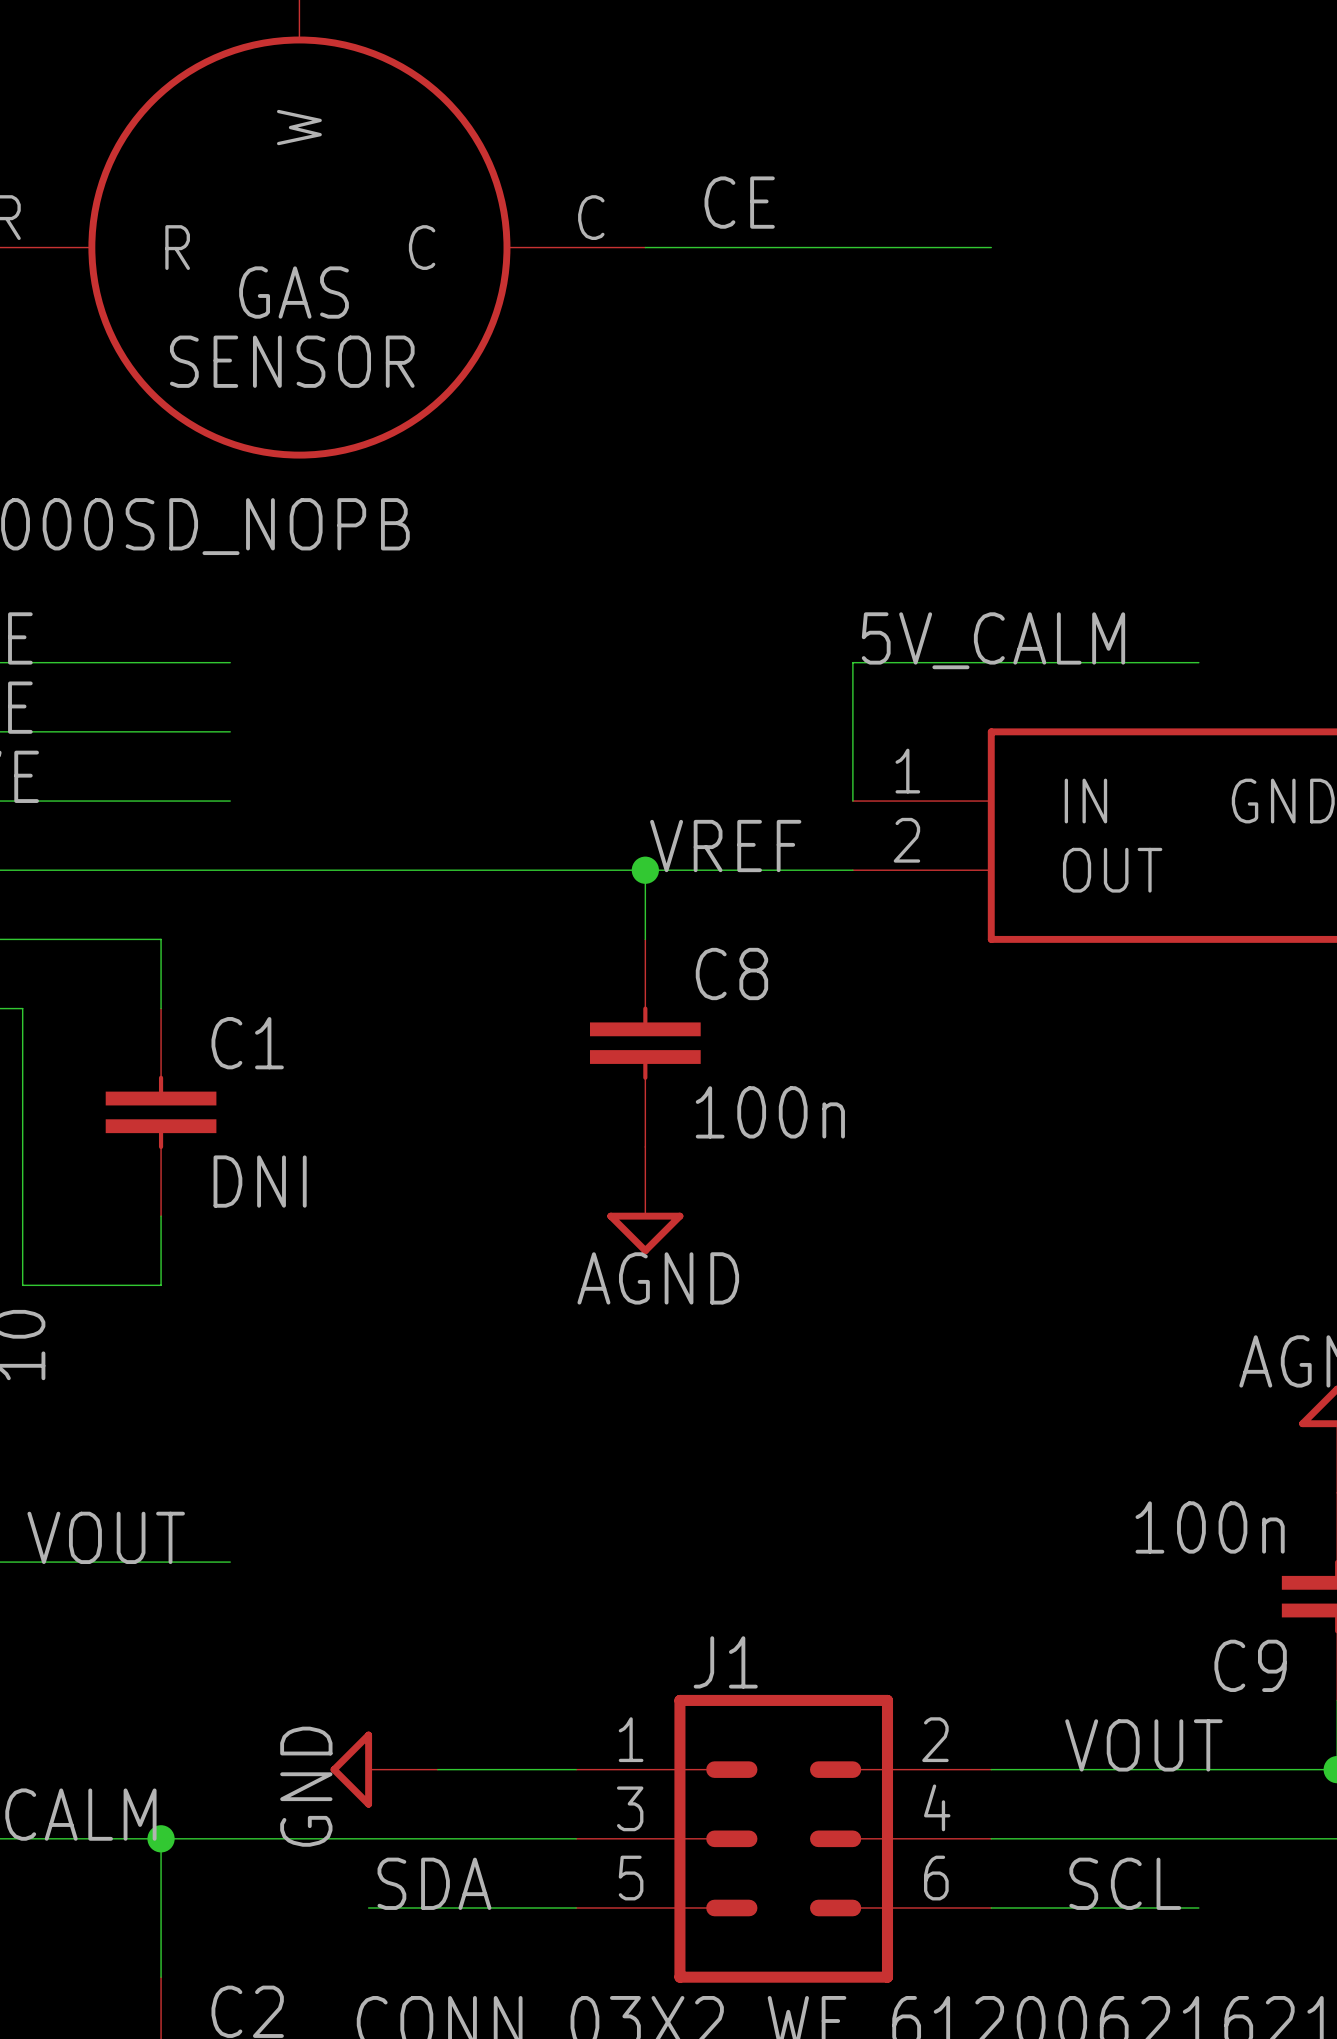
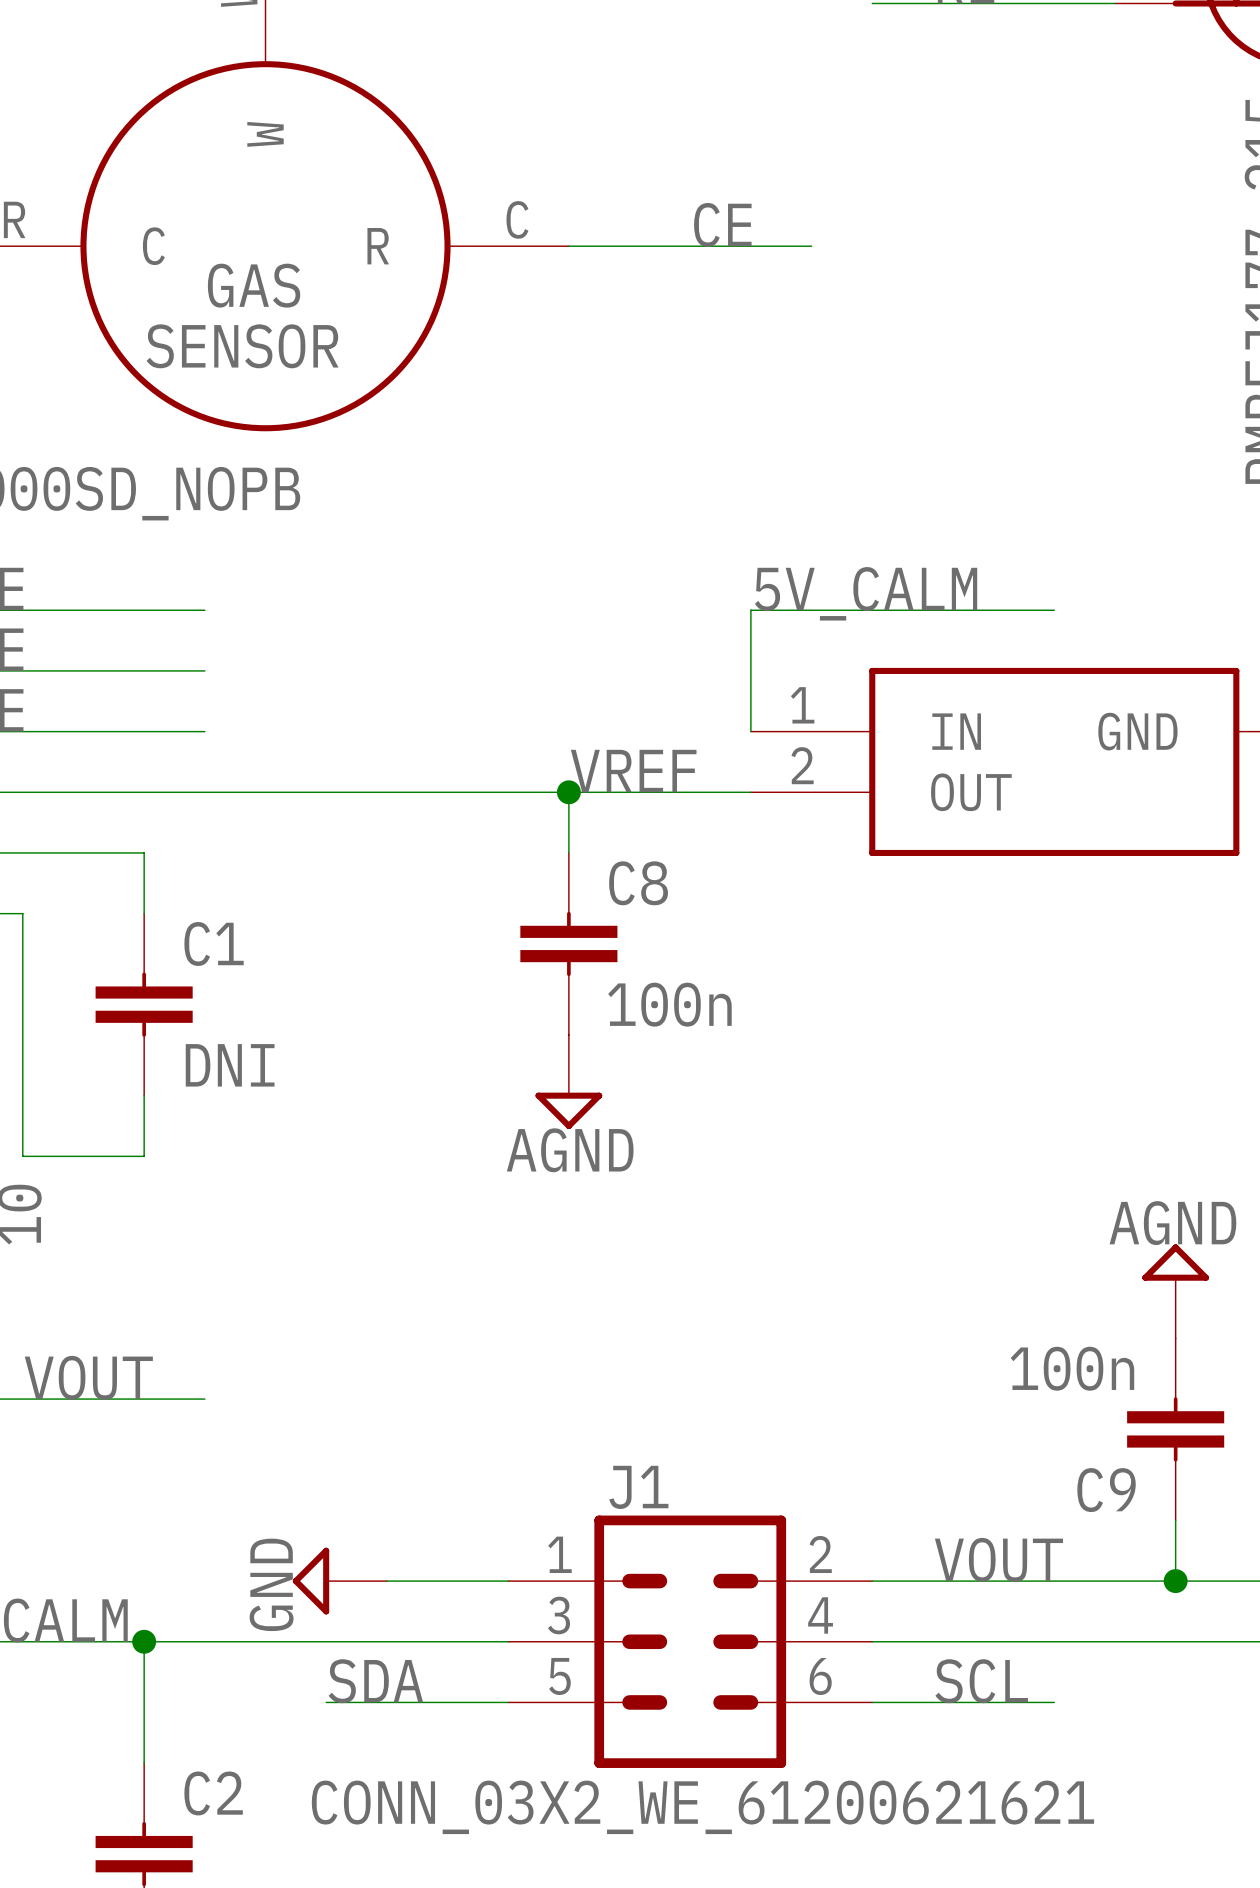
label position: CE (739, 202) -> CE (722, 224)
part pin name: R (177, 247) -> C (153, 246)
part pin name: C (422, 247) -> R (378, 246)
wire: (922, 247) (991, 247) -> none

